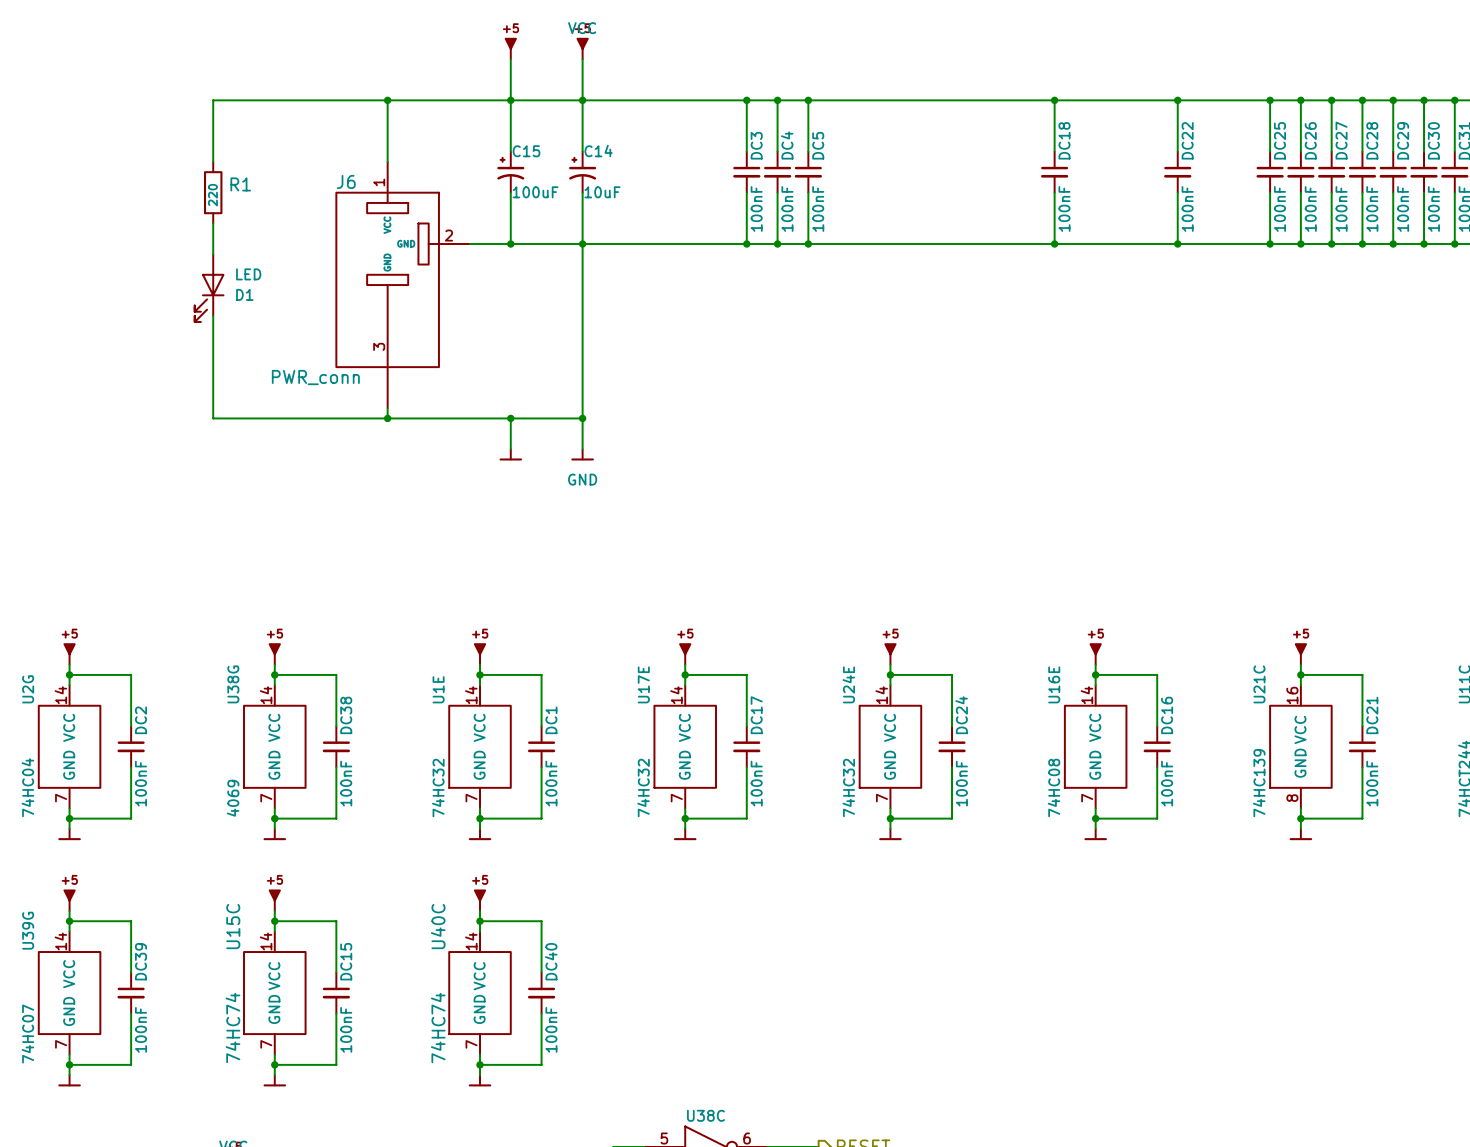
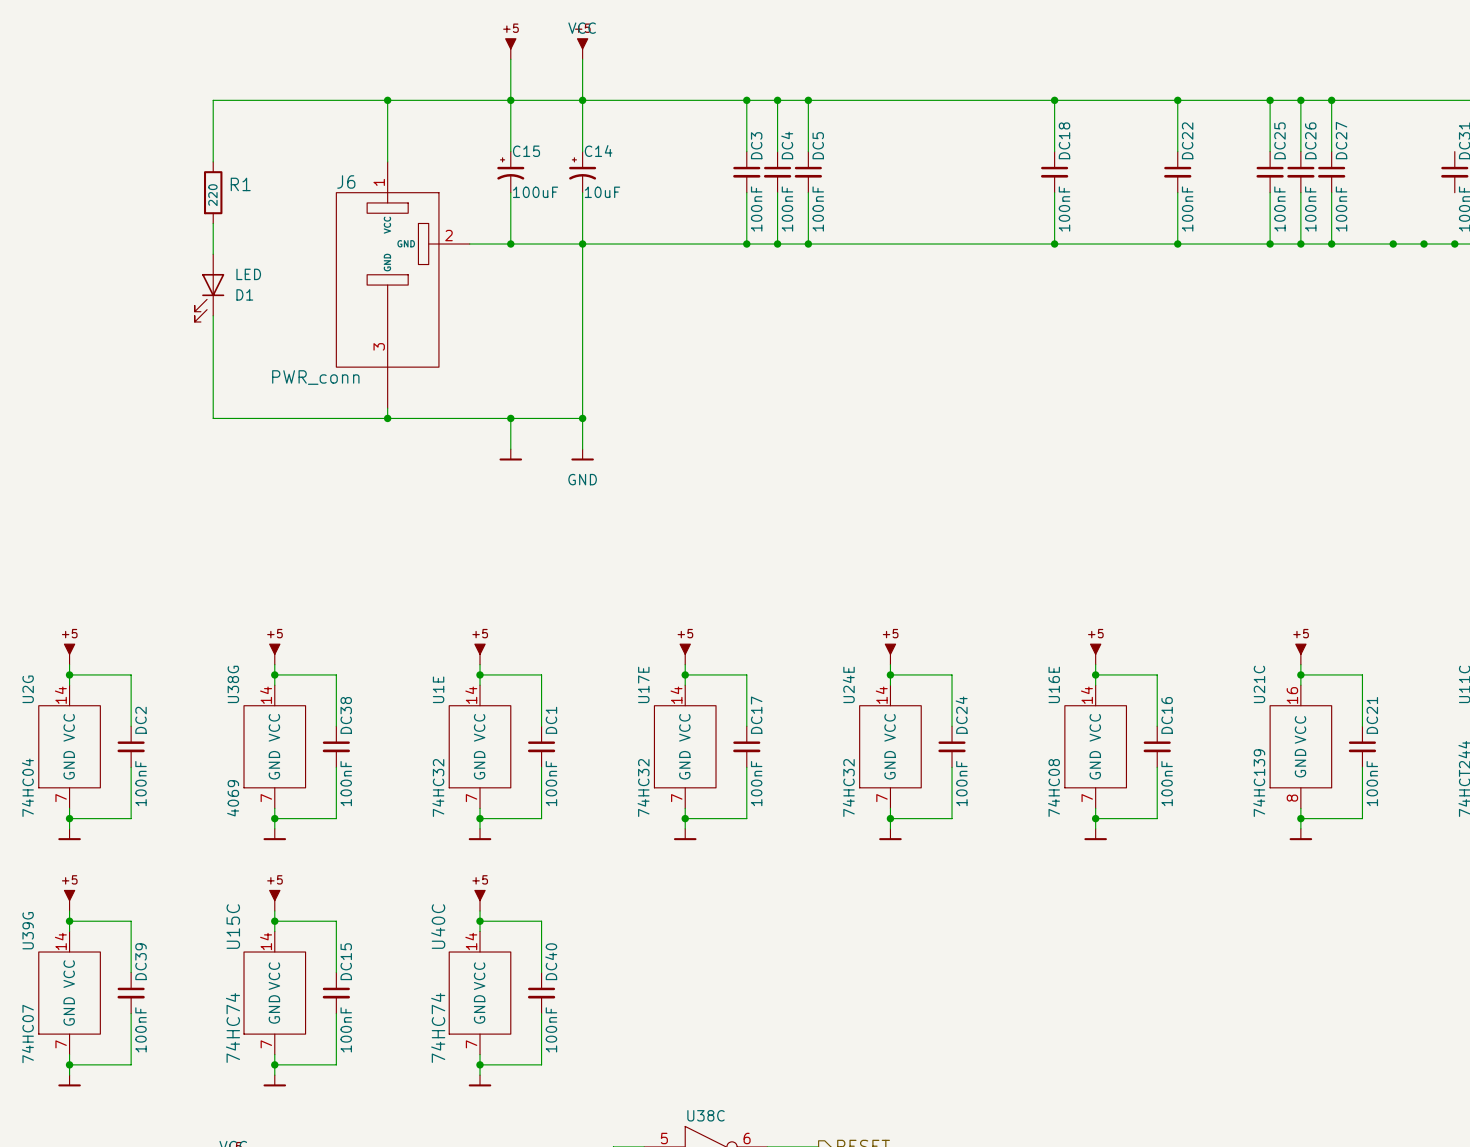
wire: (1362, 100) (1362, 151) -> none
junction: (1362, 100) -> none
wire: (1393, 100) (1393, 151) -> none
junction: (1393, 100) -> none
wire: (1424, 100) (1424, 151) -> none
junction: (1424, 100) -> none
wire: (1454, 100) (1454, 151) -> none
junction: (1454, 100) -> none
DC28: 100nF (1362, 172) -> none
DC29: 100nF (1393, 172) -> none
DC30: 100nF (1424, 172) -> none
wire: (1362, 192) (1362, 244) -> none
wire: (1393, 192) (1393, 244) -> none
wire: (1424, 192) (1424, 244) -> none
wire: (1454, 192) (1454, 244) -> none
junction: (1362, 244) -> none

